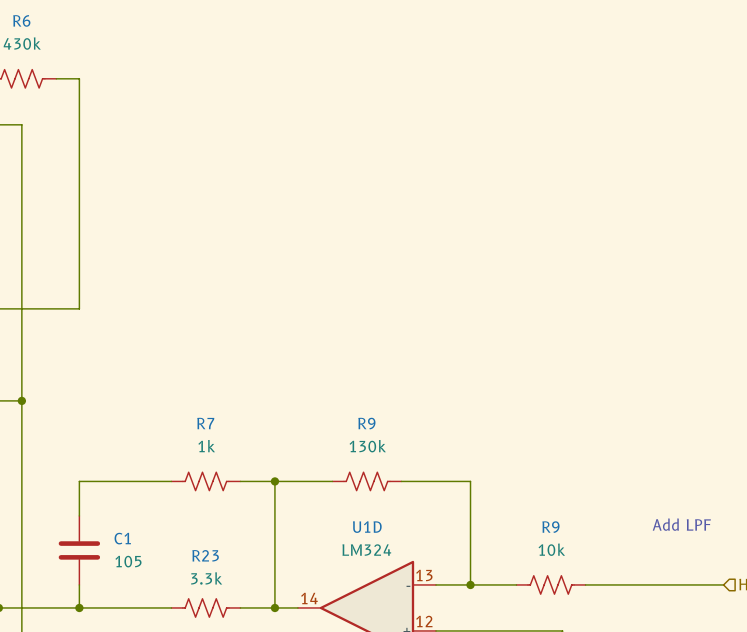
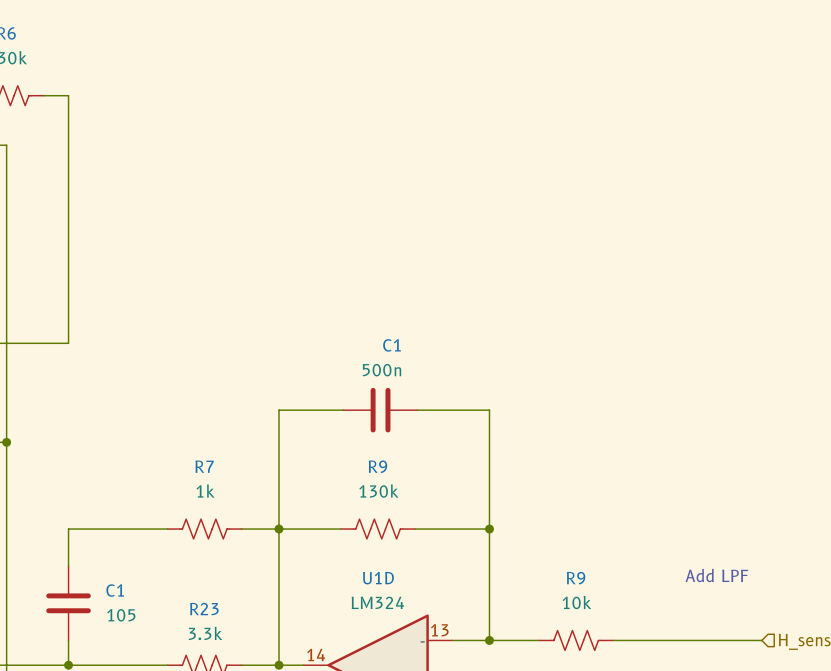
wire: none -> (343, 410) (279, 410) (279, 529)
C1: none -> 500n (380, 410)
wire: none -> (417, 410) (489, 410) (489, 529)
junction: none -> (489, 529)

